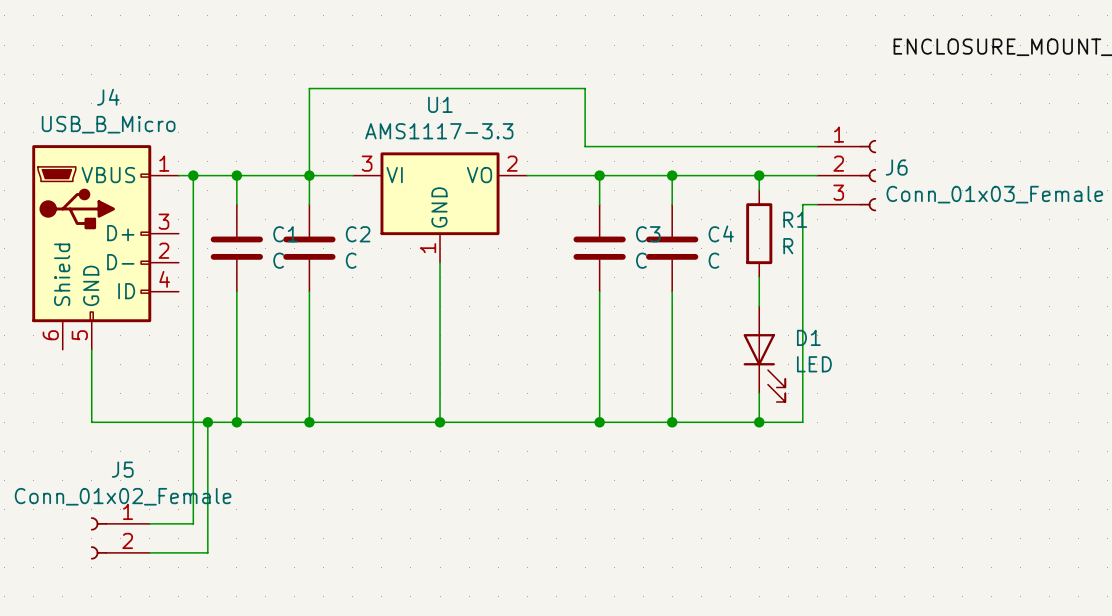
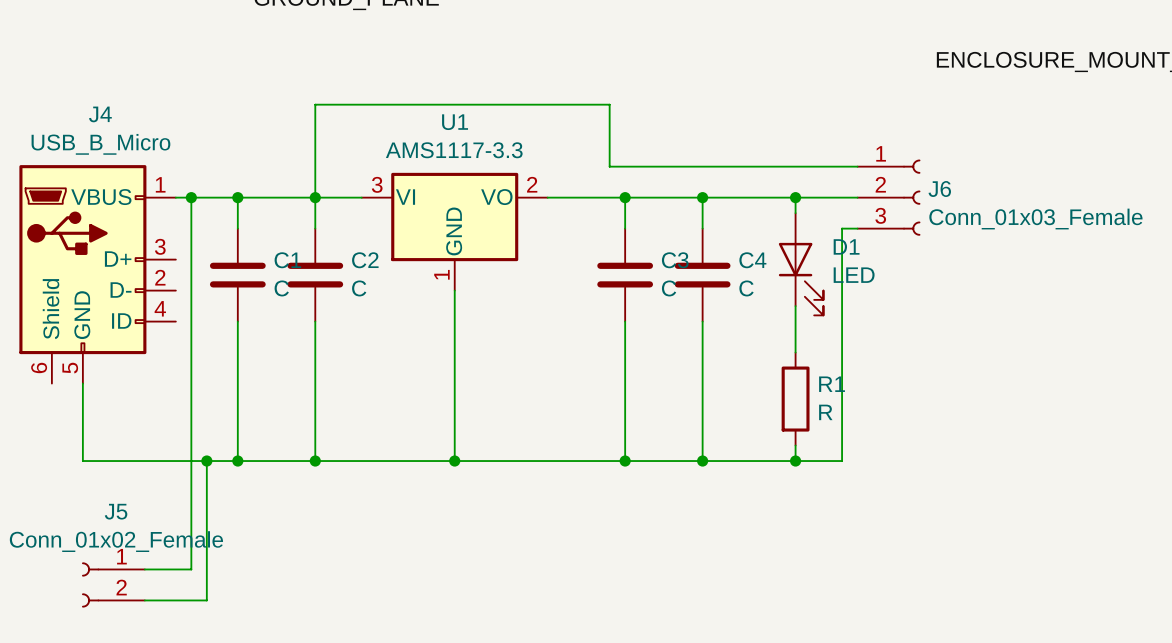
R1 position: (759, 233) -> (795, 399)
D1 position: (764, 354) -> (801, 264)

